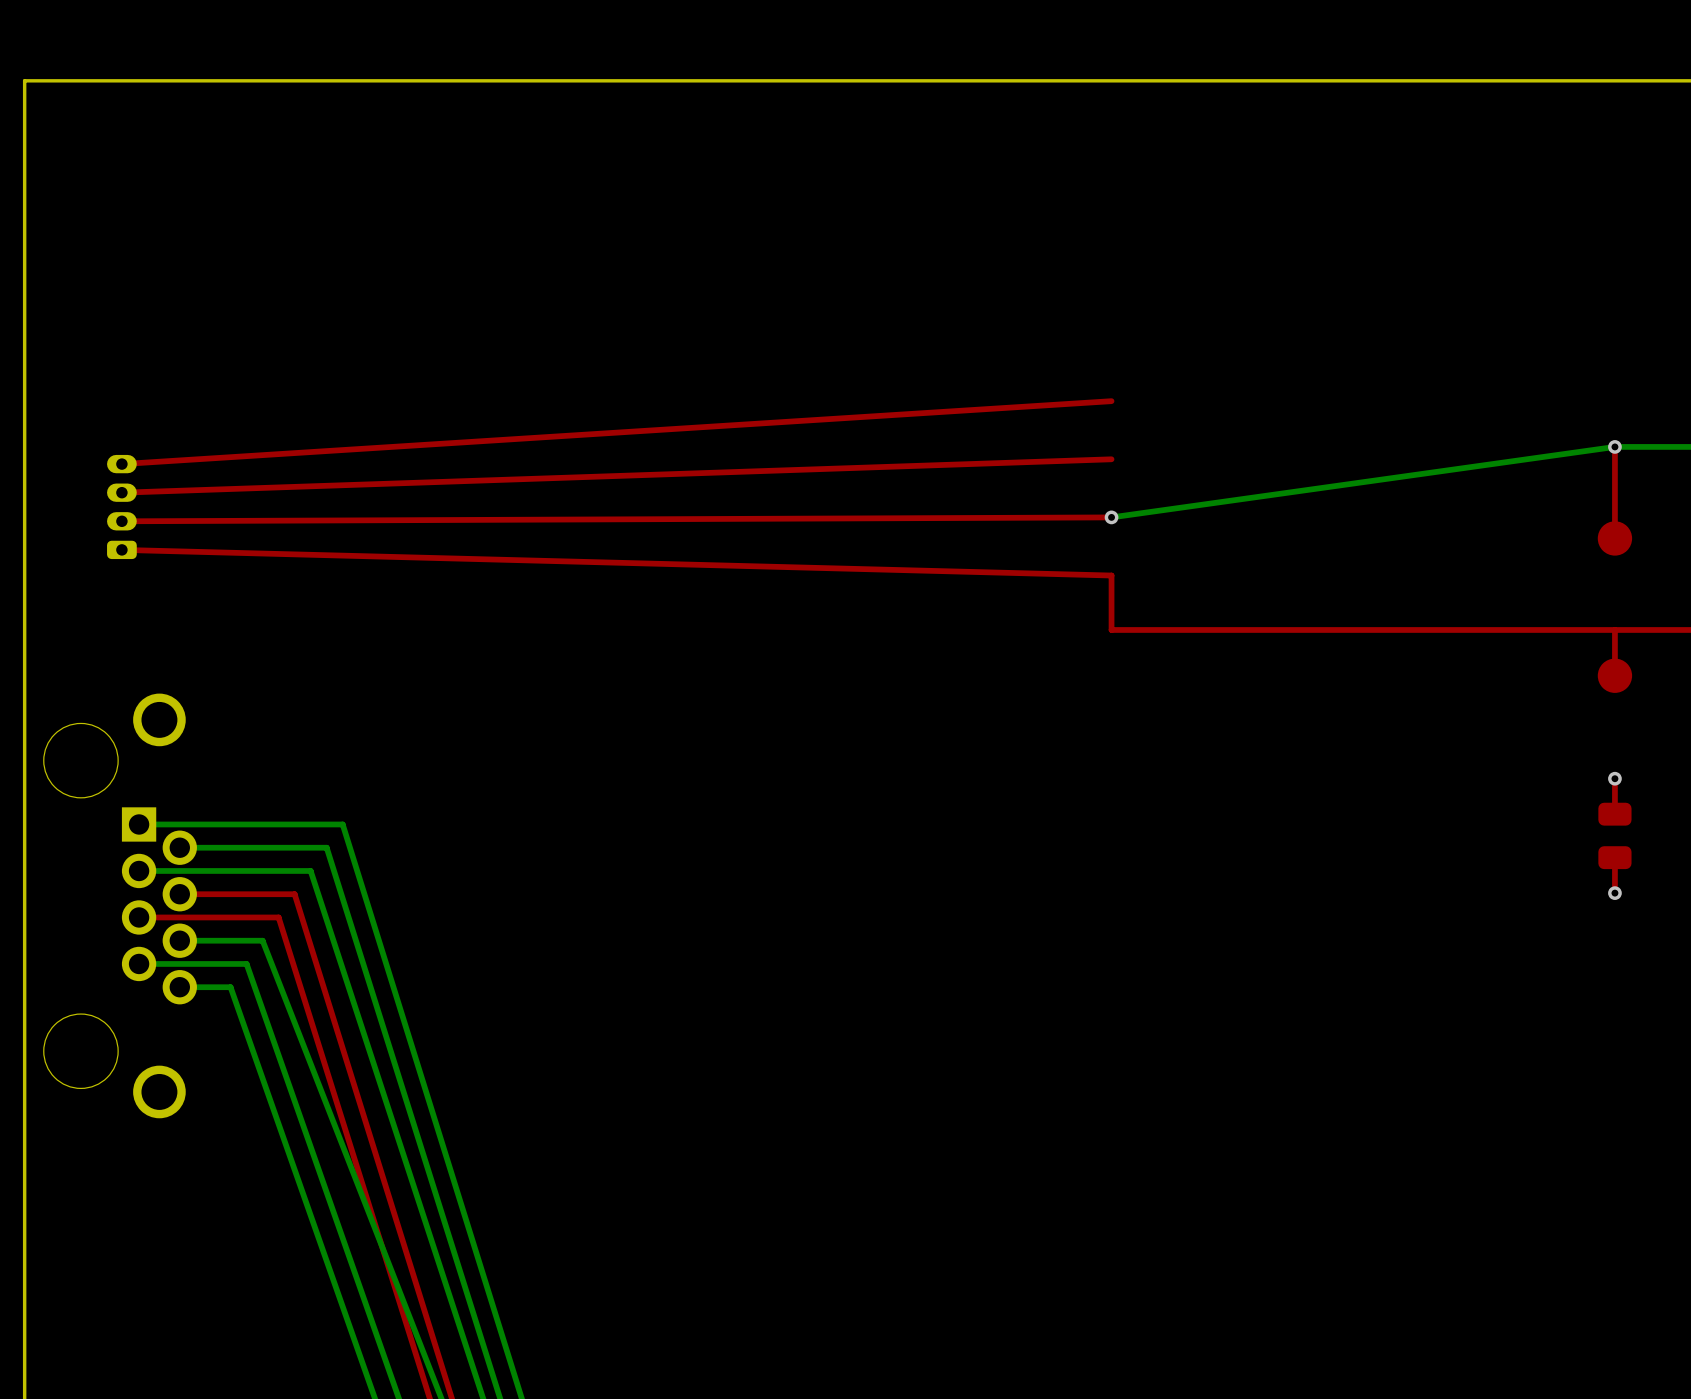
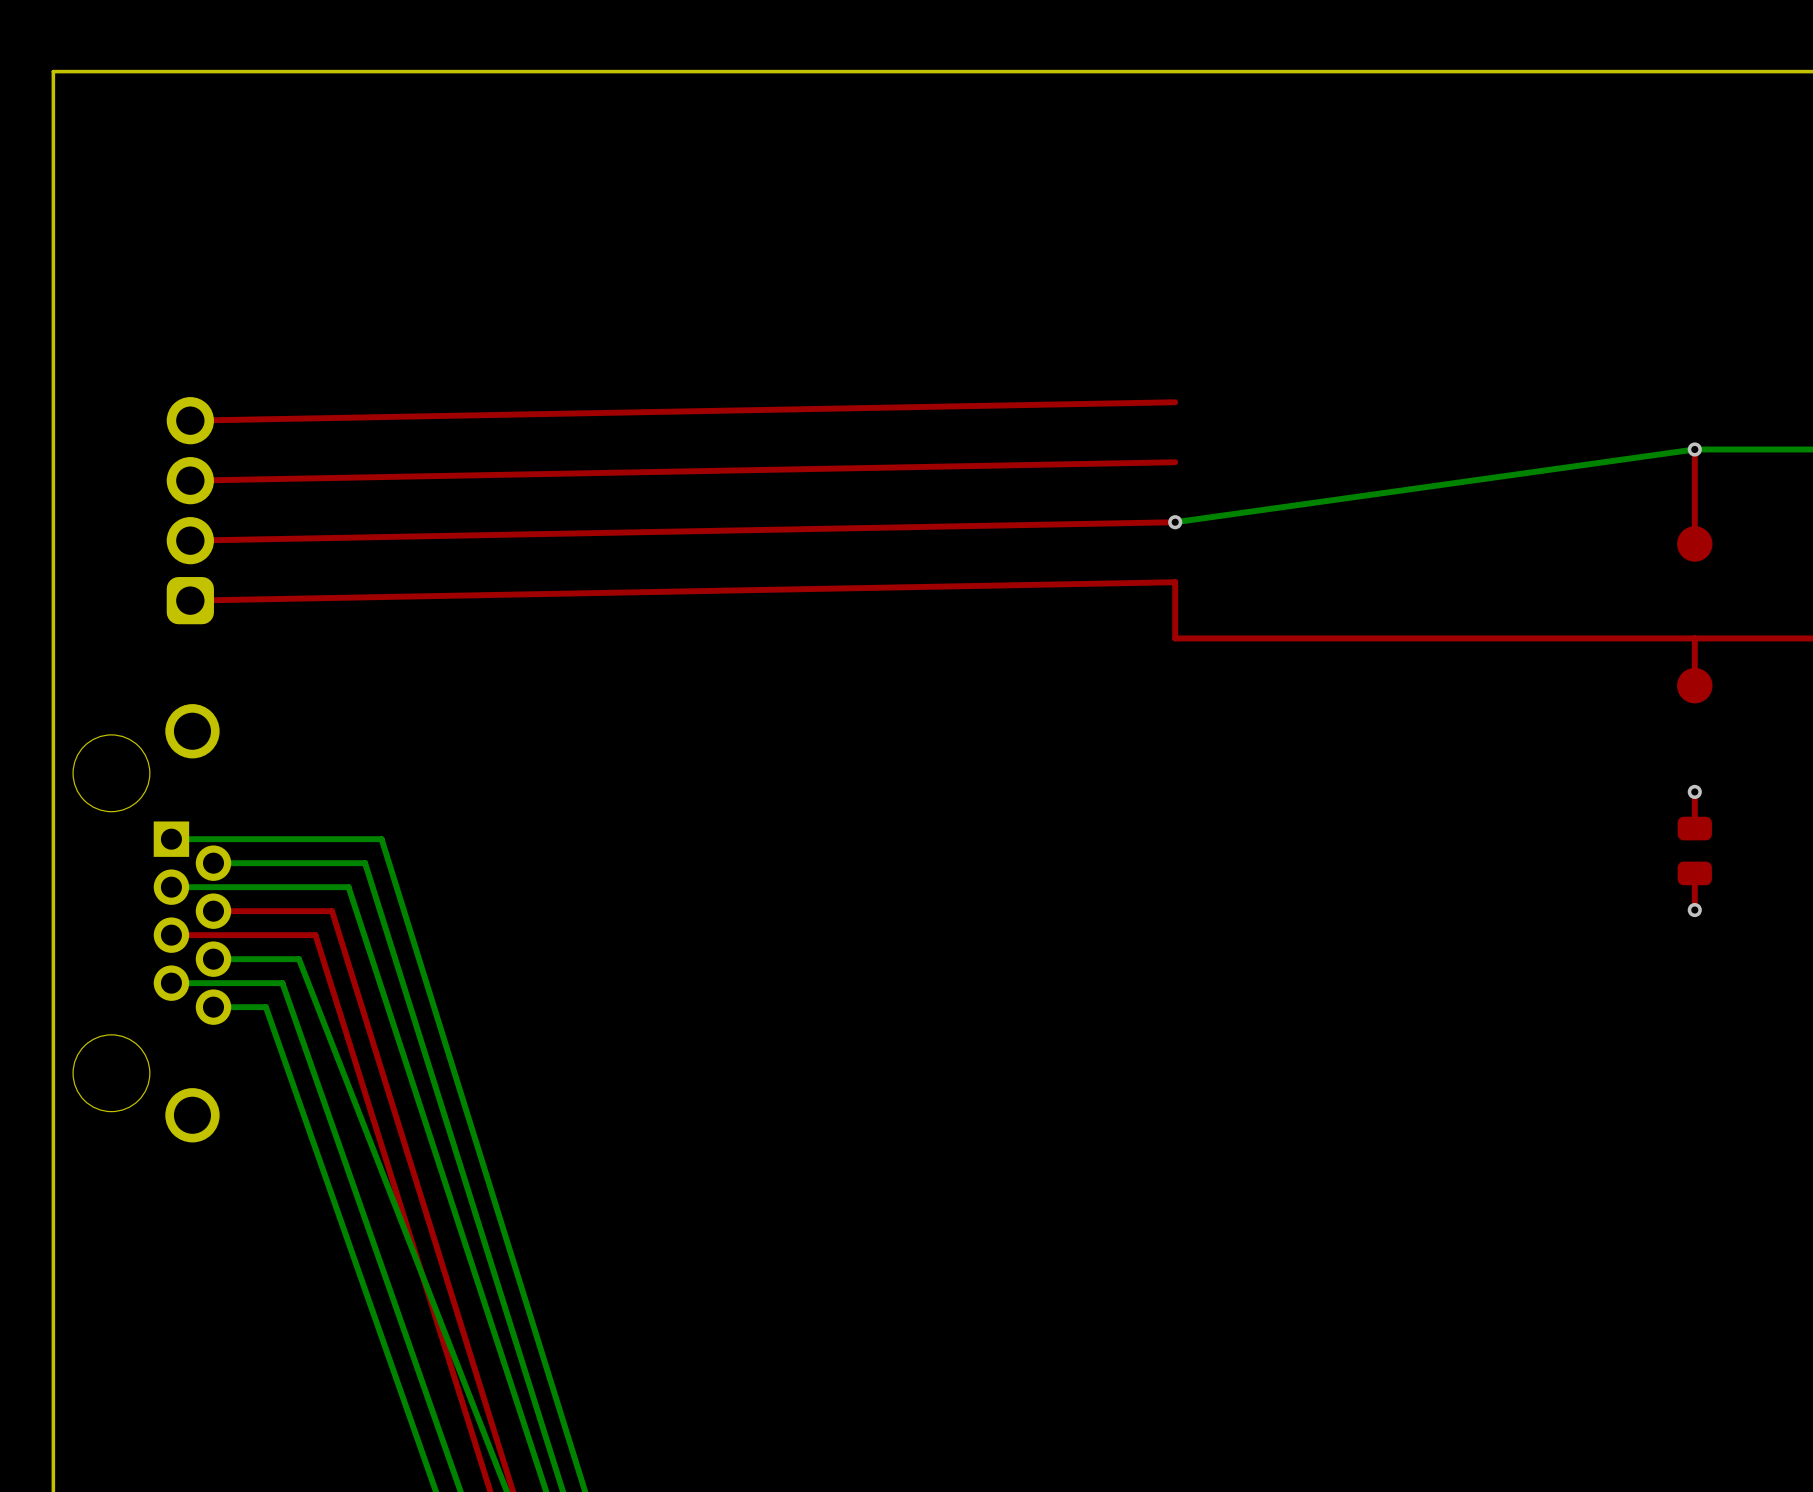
top track: (1111, 401) (121, 464) -> (1175, 402) (190, 420)
top track: (1111, 459) (121, 492) -> (1175, 462) (190, 480)
part: (121, 506) -> none
part: none -> (190, 510)
top track: (1111, 517) (121, 521) -> (1175, 522) (190, 540)
top track: (121, 549) (1111, 575) -> (190, 600) (1175, 582)

